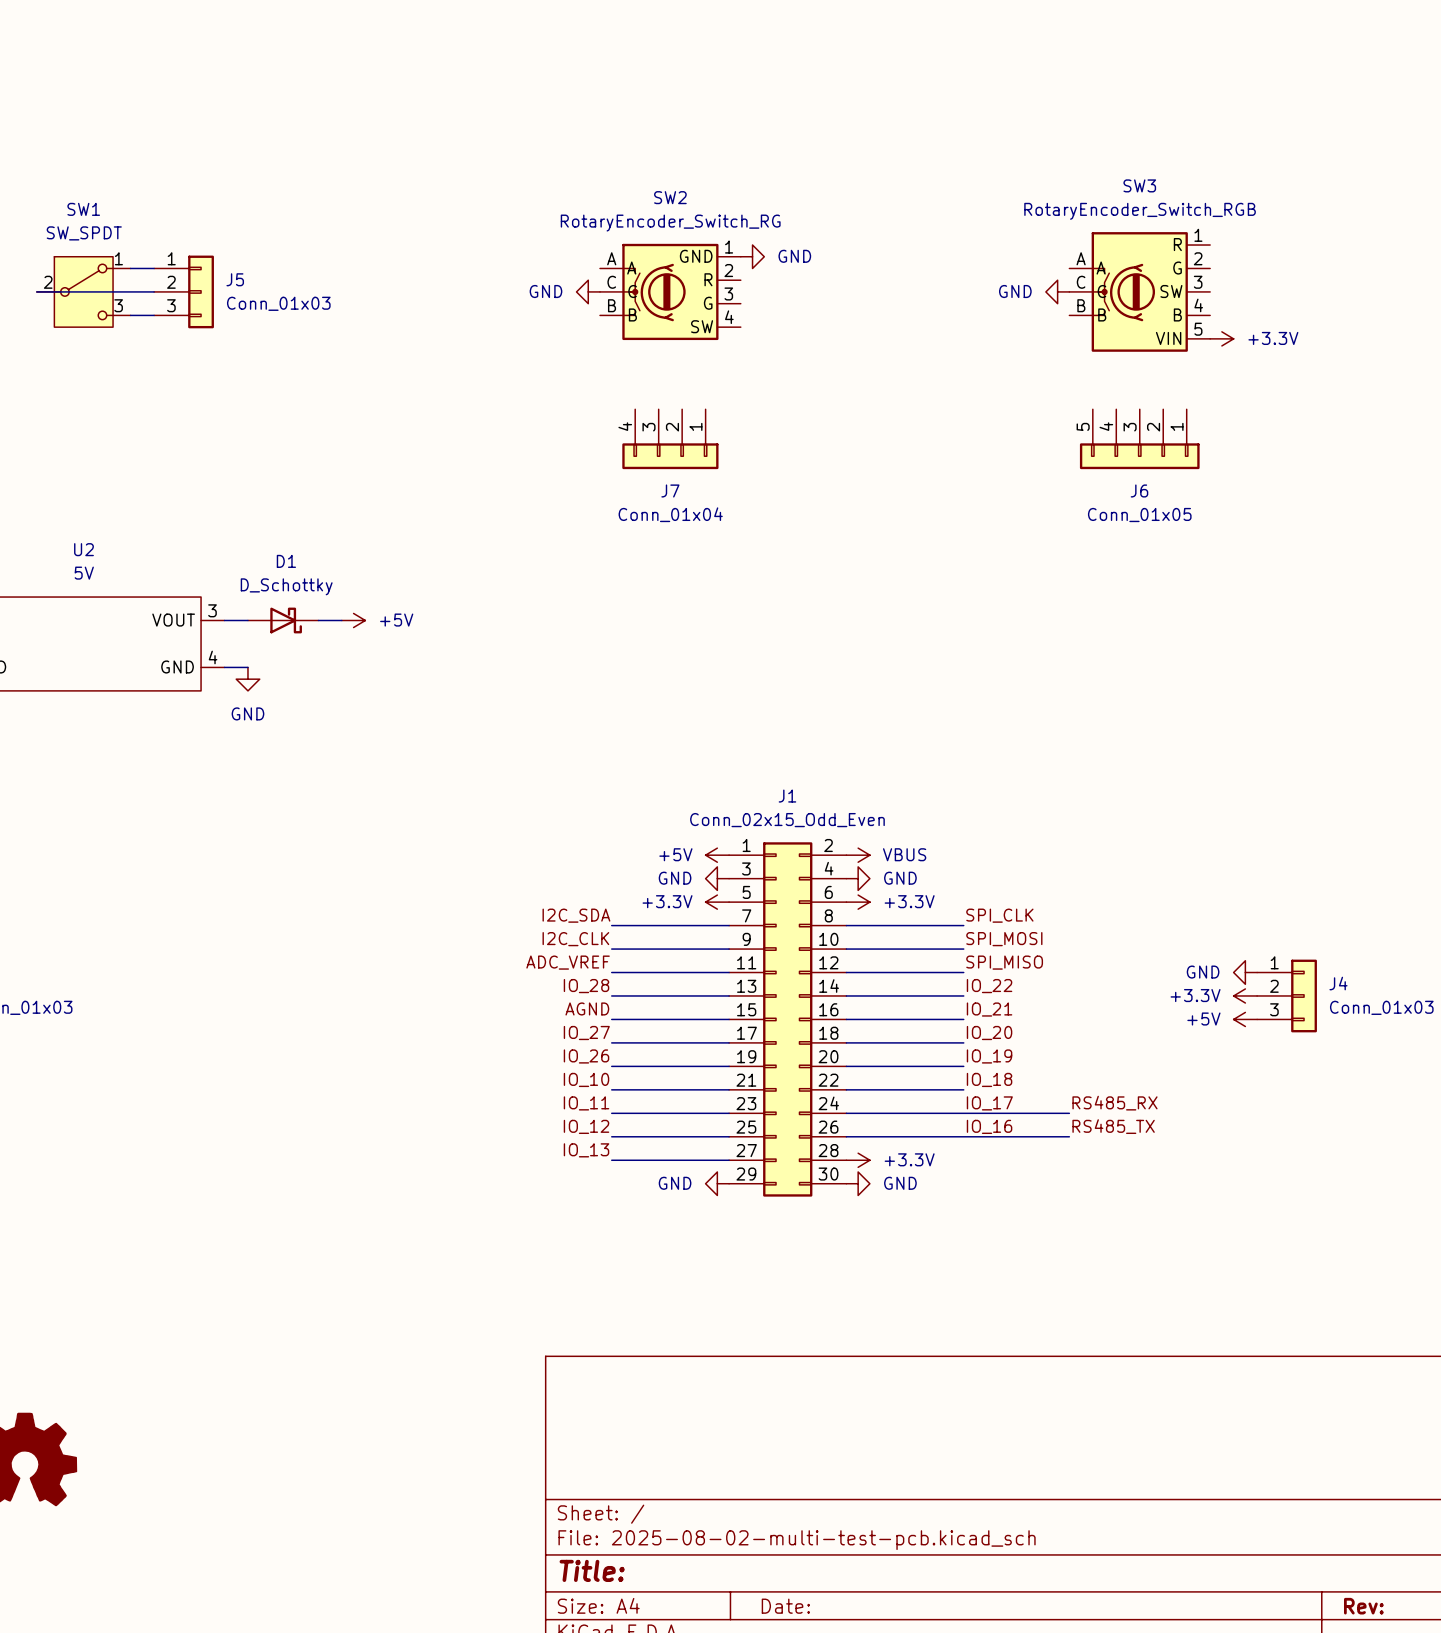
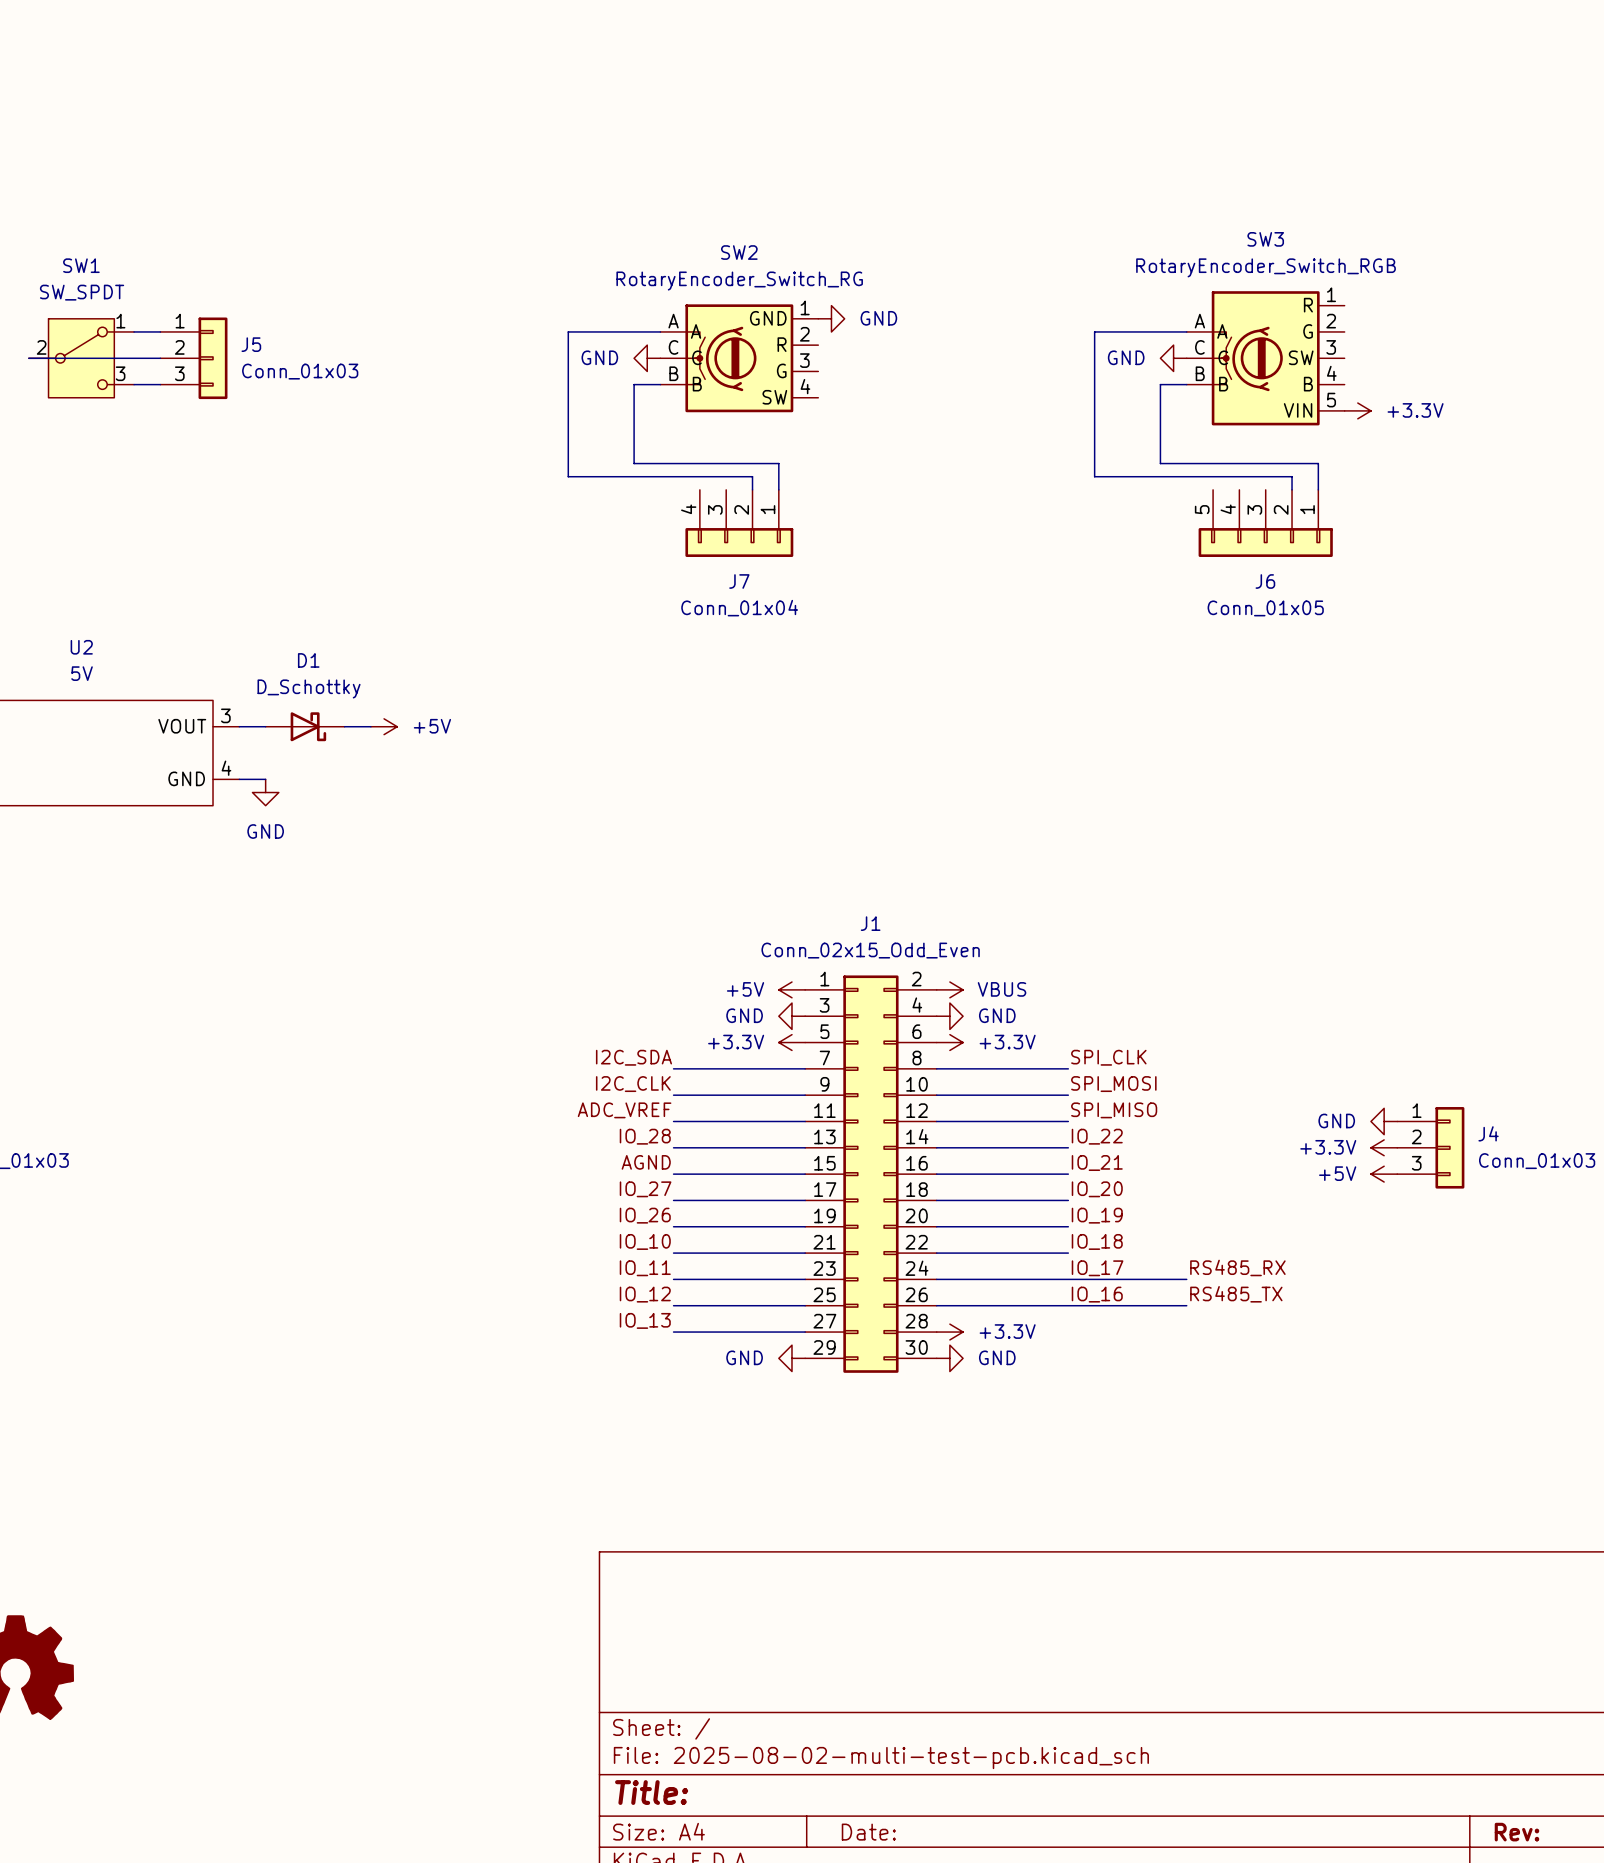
wire: none -> (660, 331) (568, 331) (568, 476) (752, 476) (752, 489)
wire: none -> (1186, 331) (1094, 331) (1094, 476) (1292, 476) (1292, 489)
wire: none -> (660, 384) (634, 384) (634, 463) (778, 463) (778, 489)
wire: none -> (1186, 384) (1160, 384) (1160, 463) (1318, 463) (1318, 489)

